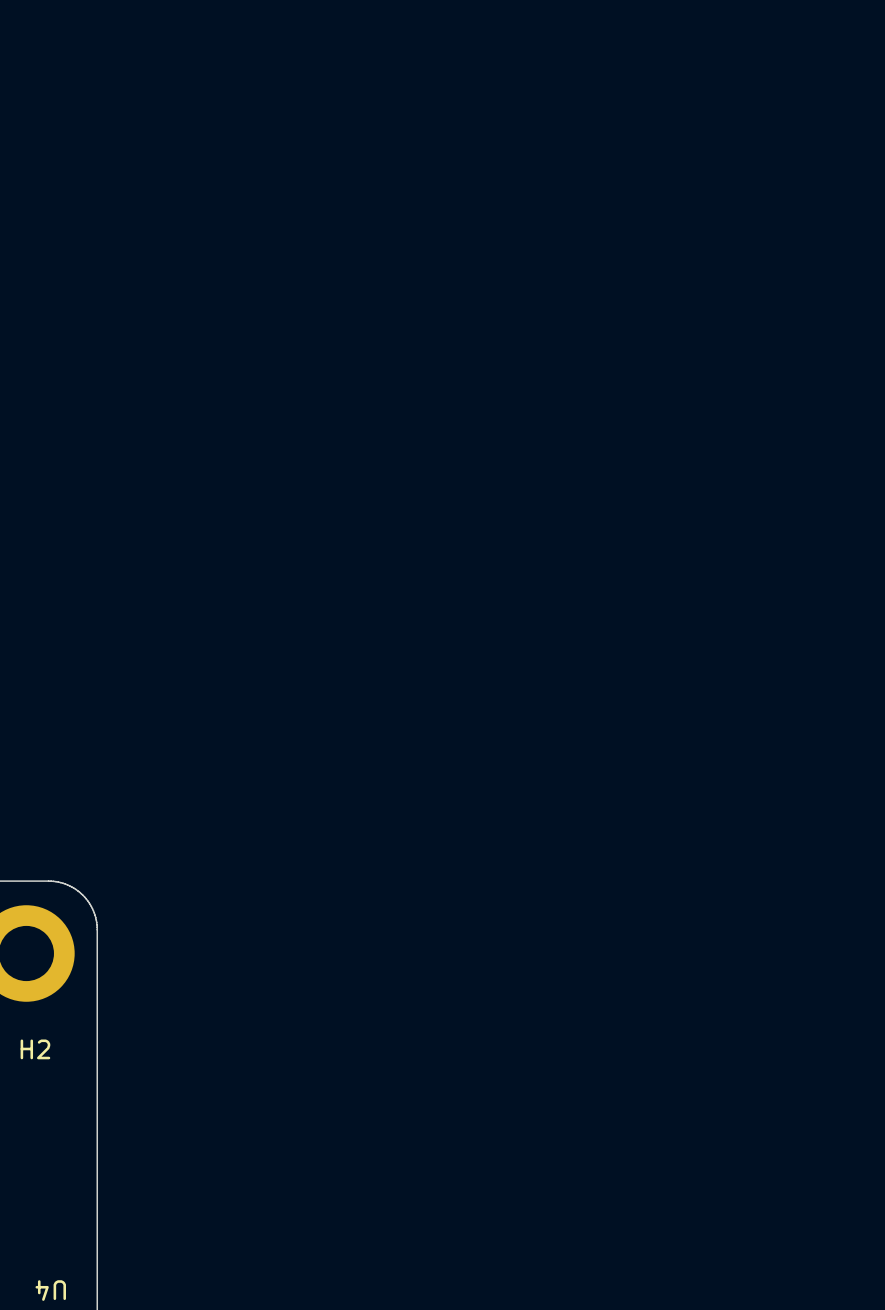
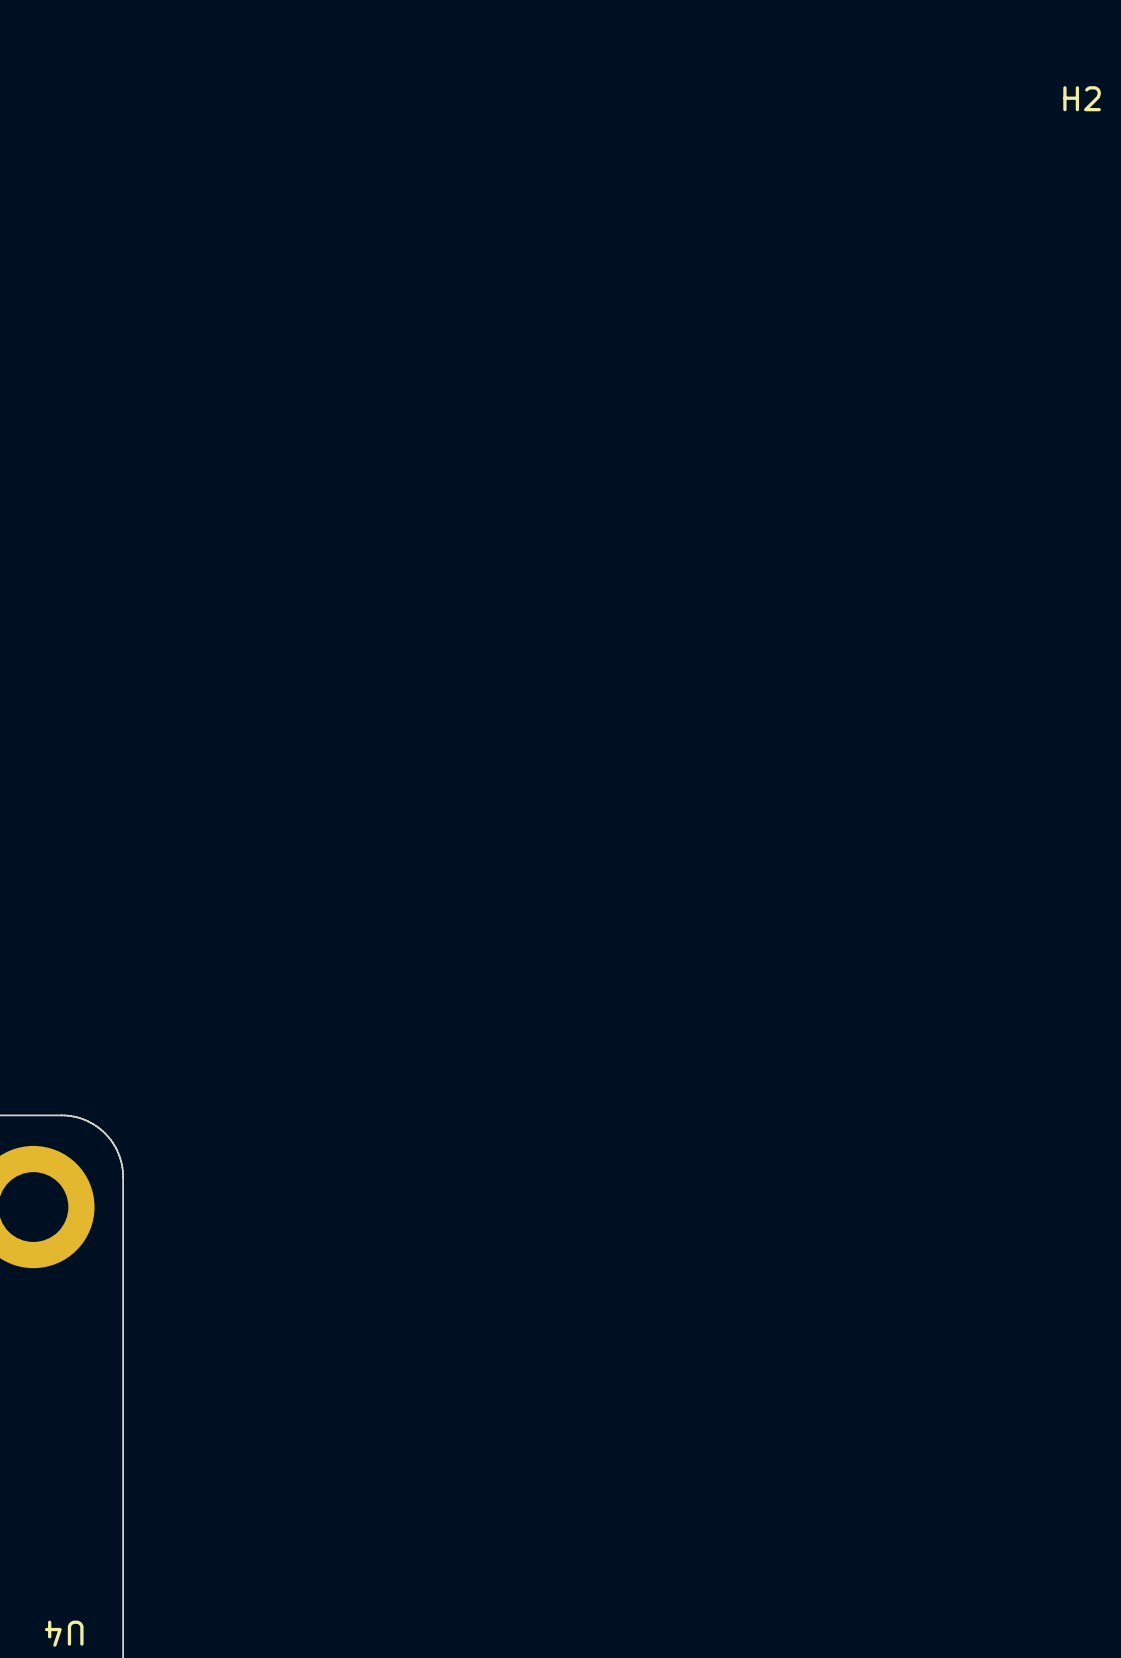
H2 name position: H2 (35, 1049) -> H2 (1082, 98)

